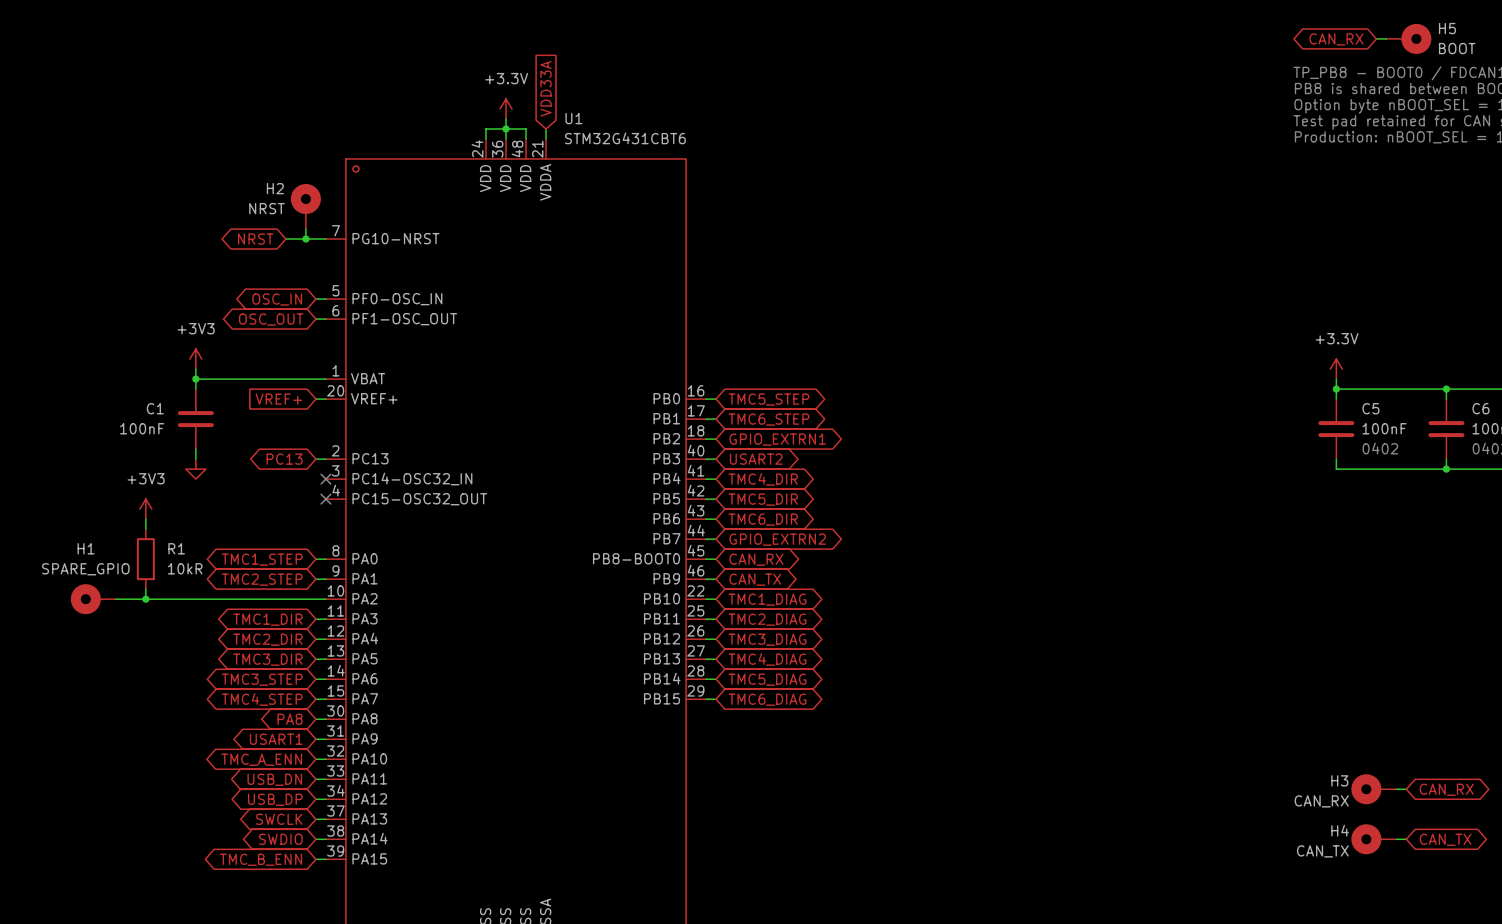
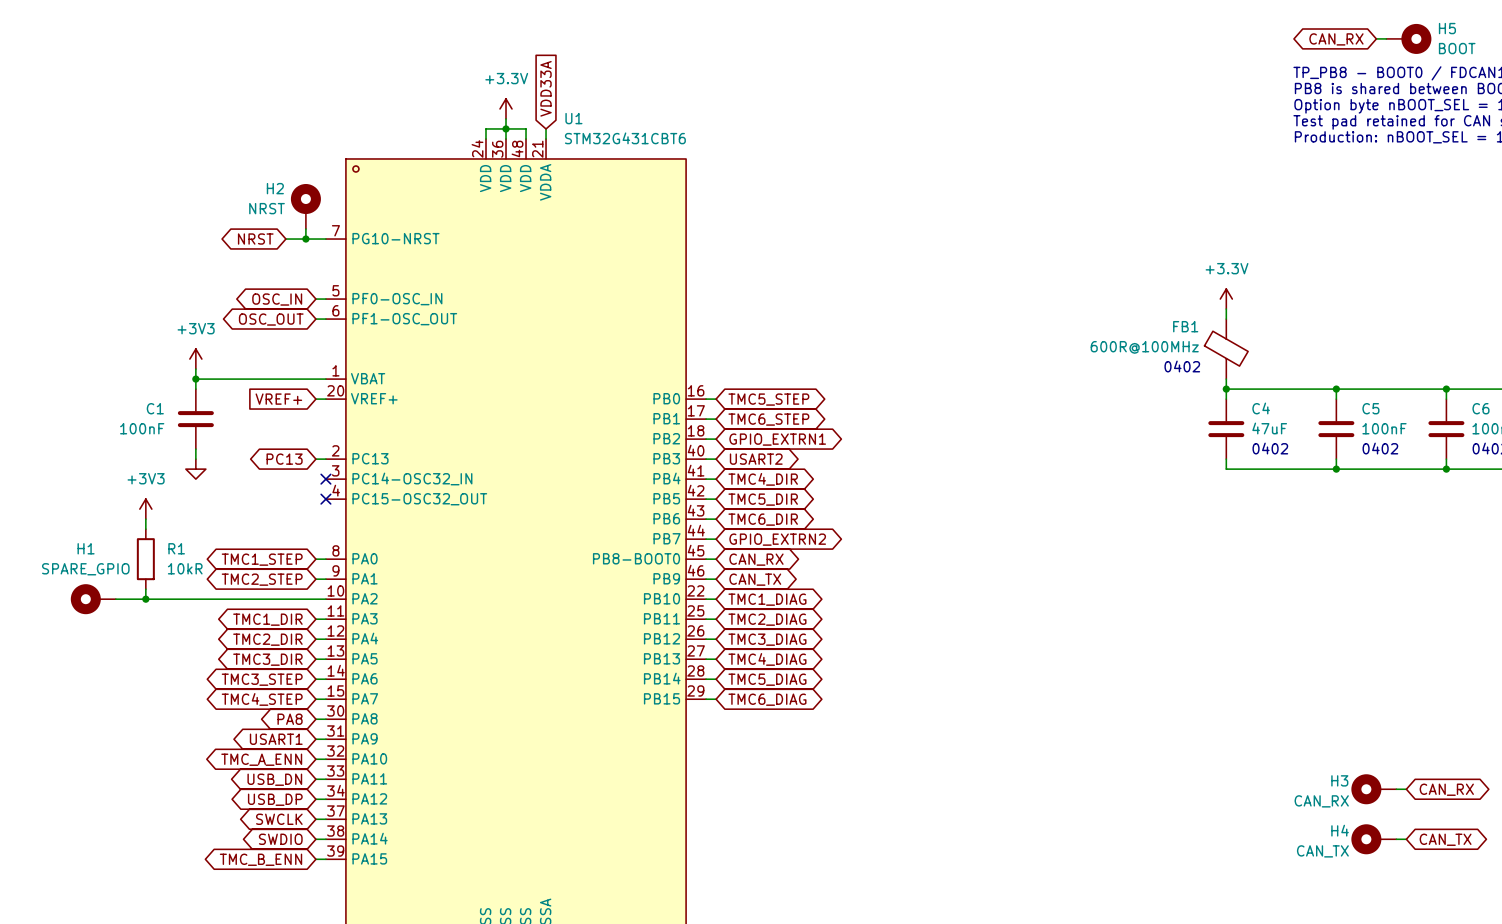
wire: none -> (1226, 309) (1226, 319)
FB1: none -> 600R@100MHz (1226, 349)
text: none -> 0402 (1182, 366)
power symbol position: +3.3V (1336, 369) -> +3.3V (1226, 299)
wire: none -> (1226, 379) (1226, 399)
wire: (1336, 379) (1336, 389) -> (1226, 389) (1336, 389)
junction: none -> (1226, 389)
C4: none -> 47uF (1226, 429)
text: none -> 0402 (1270, 448)
wire: none -> (1226, 459) (1226, 469) (1336, 469)
junction: none -> (1336, 469)

